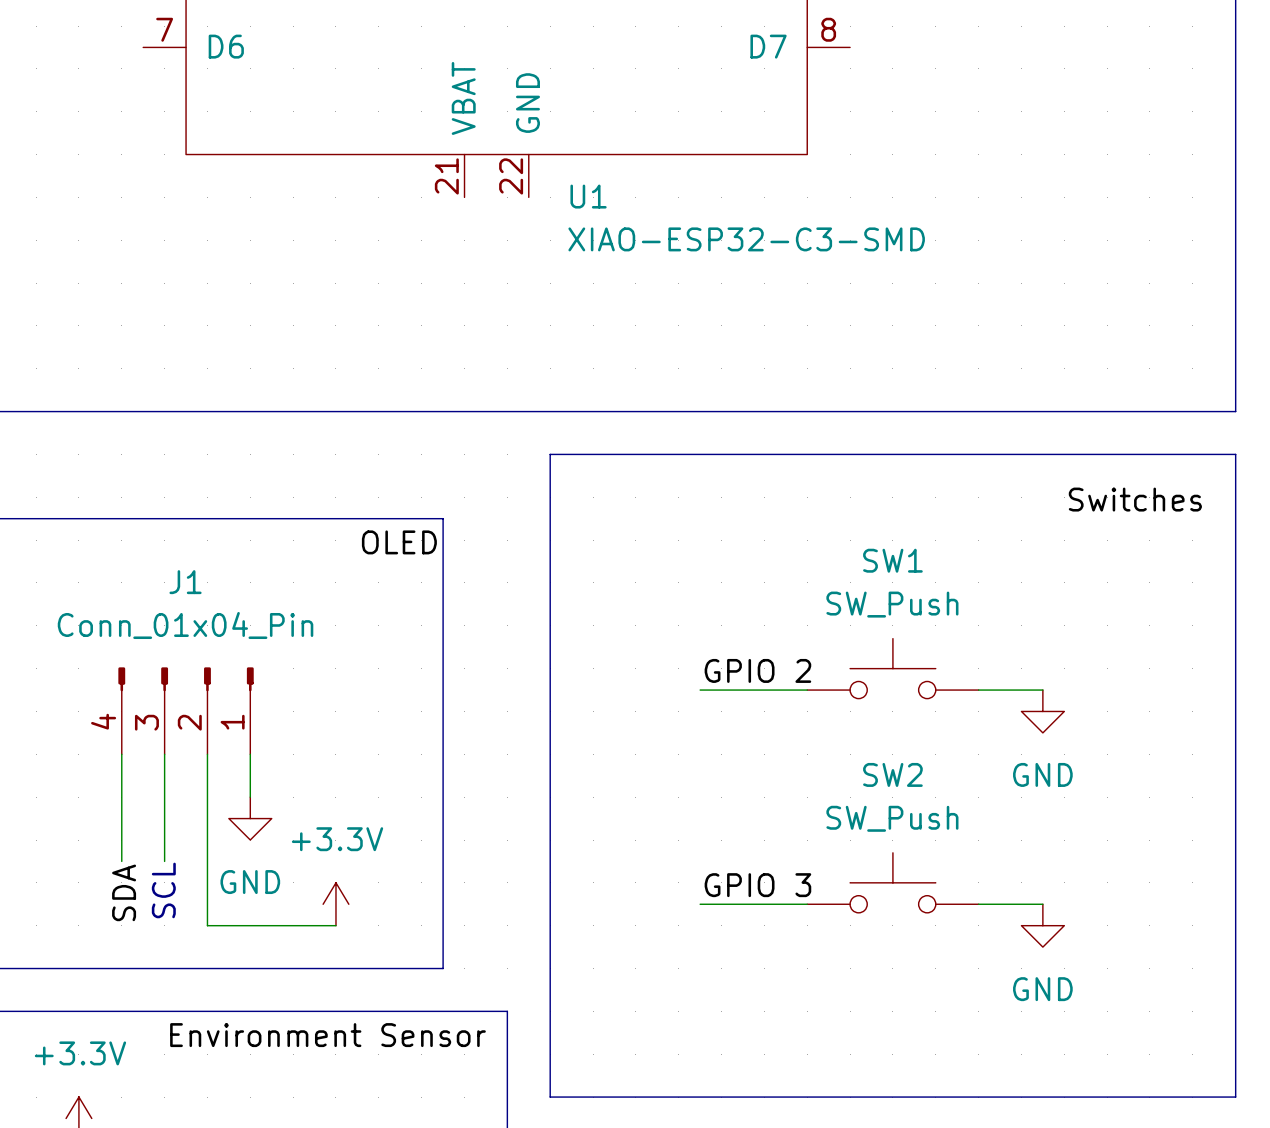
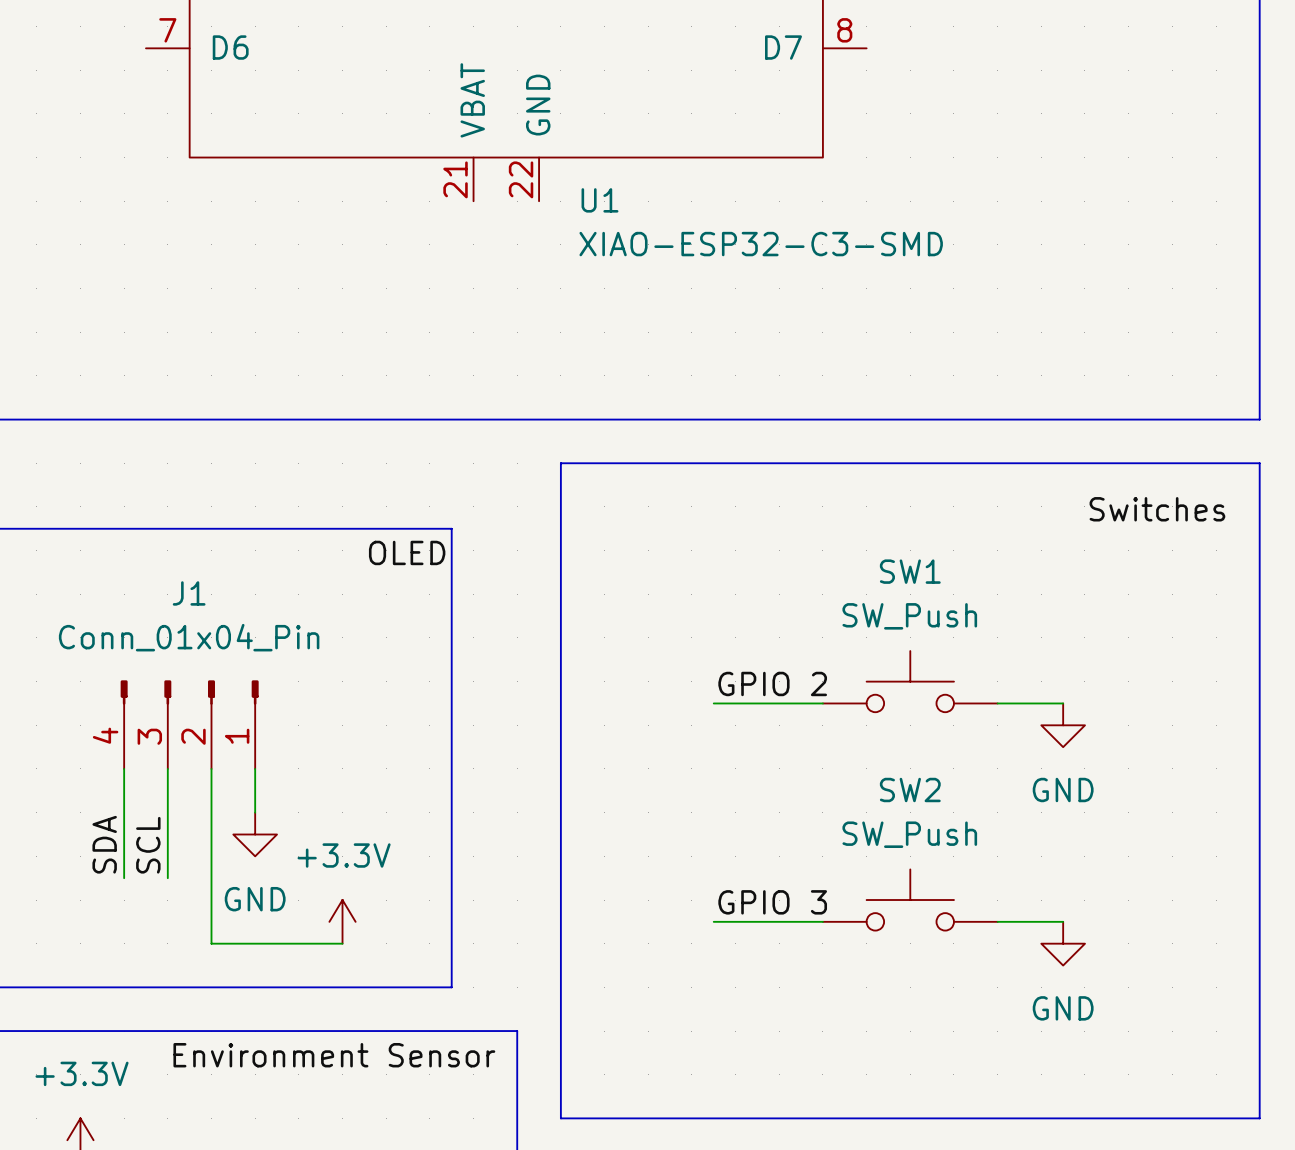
label: none -> SCL (148, 845)
text: SCL (163, 890) -> none
label position: SDA (124, 892) -> SDA (104, 844)

